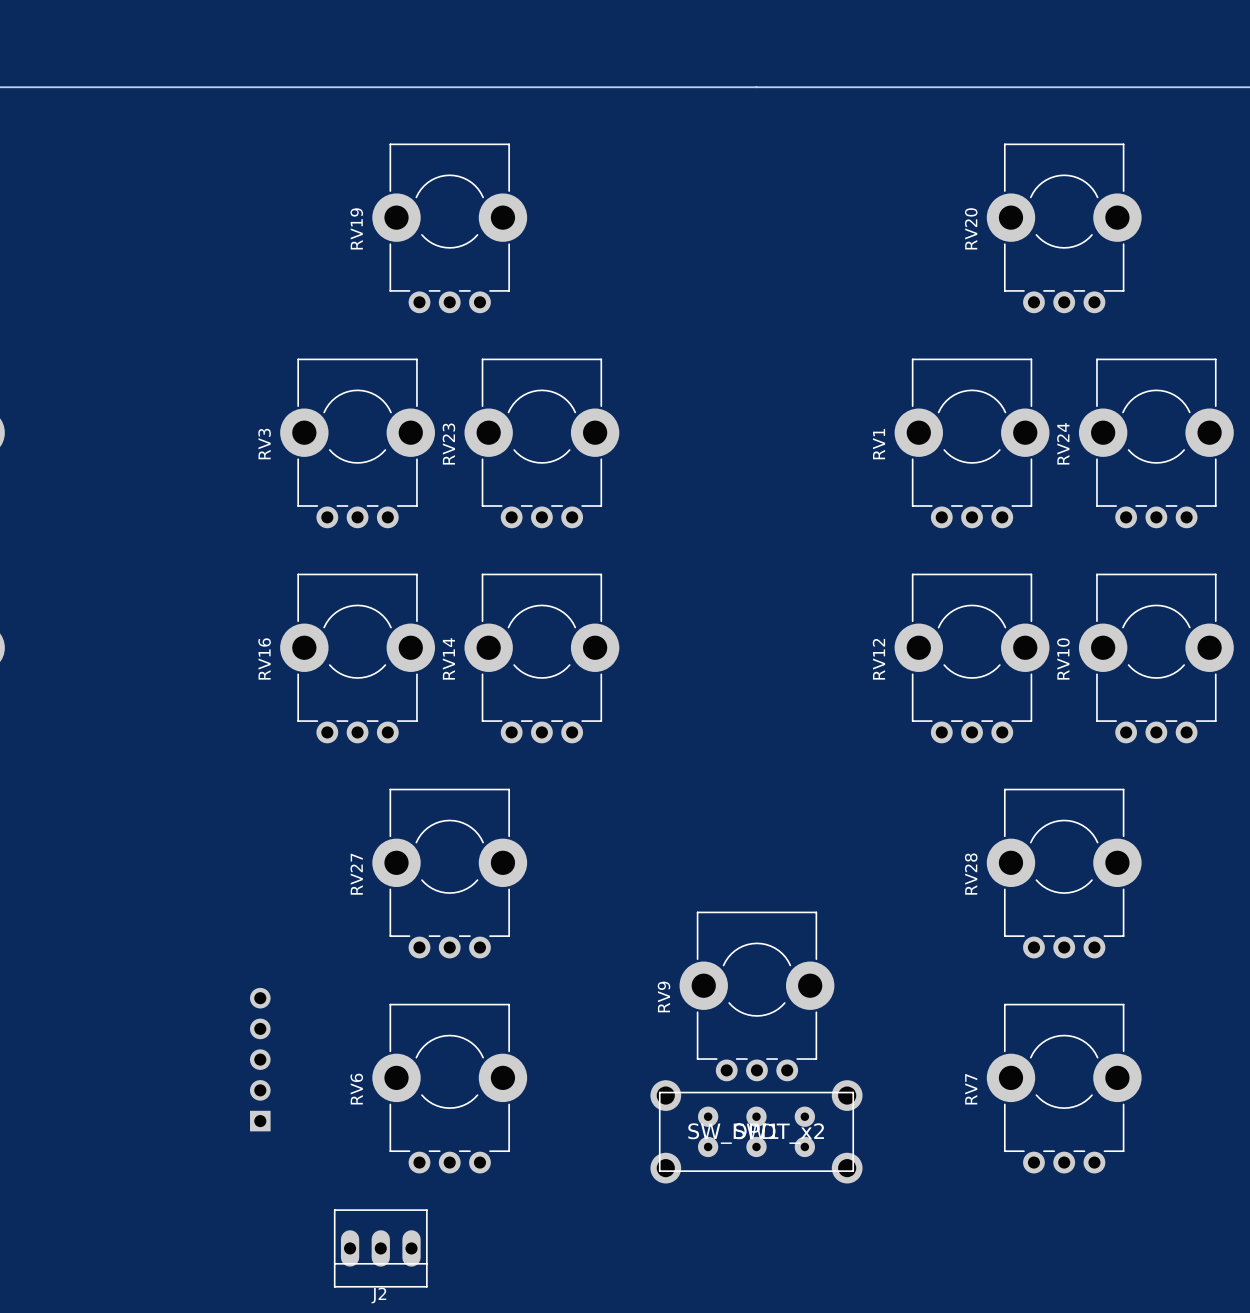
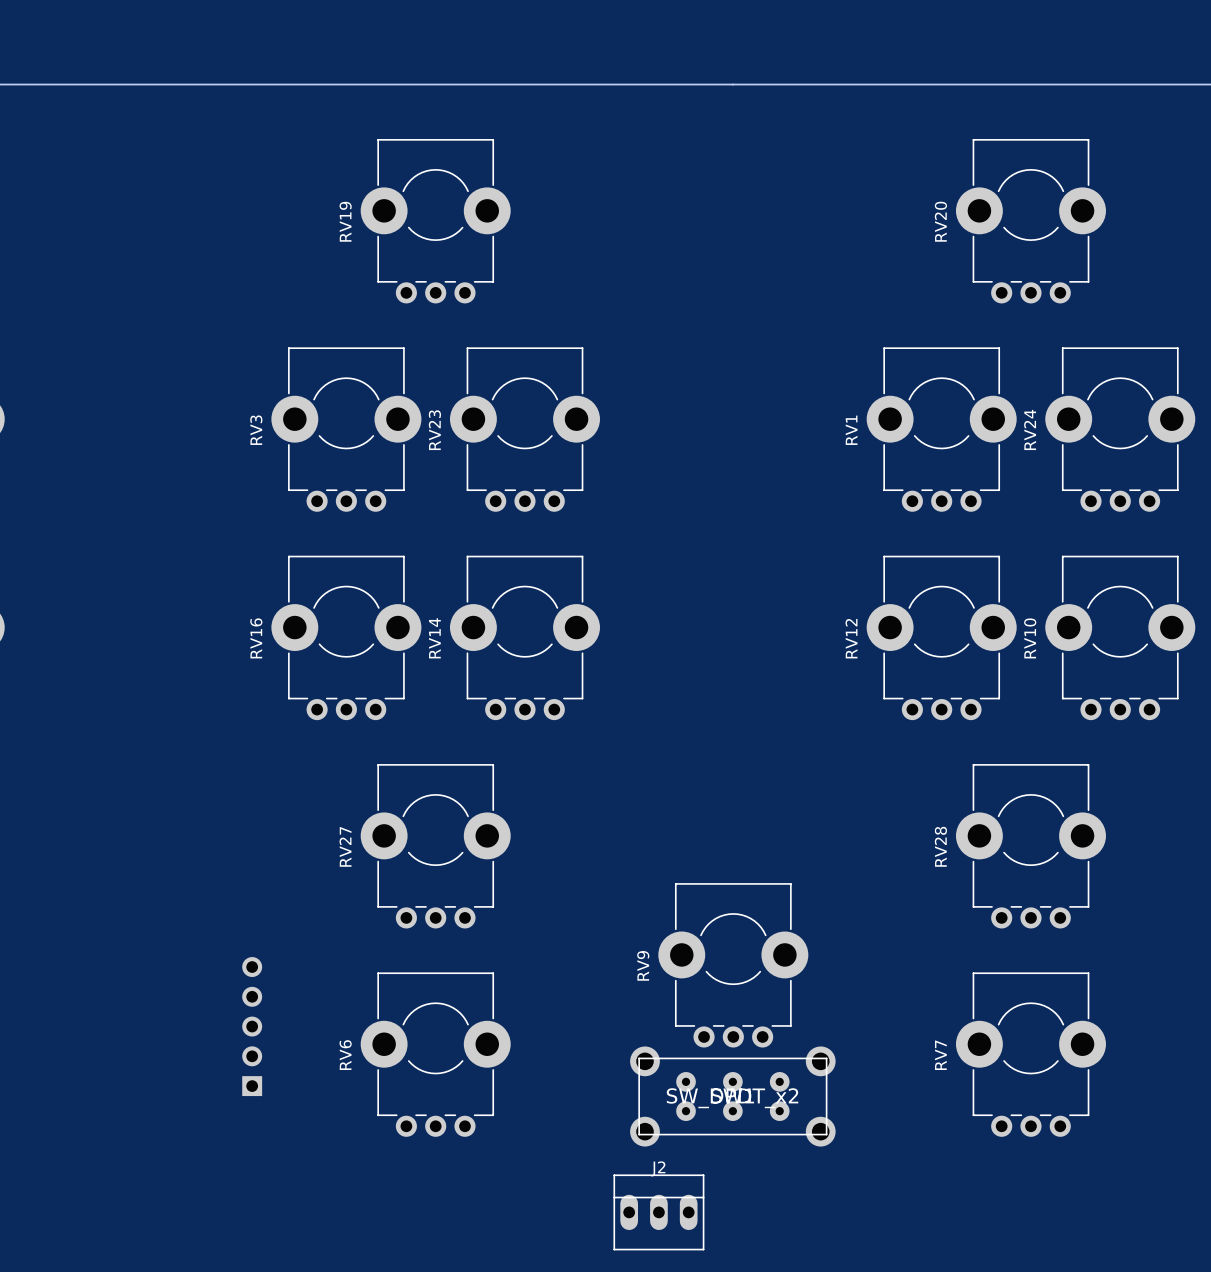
J2 rotation: 0° (380, 1248) -> 180° (658, 1212)
J2 position: (380, 1248) -> (658, 1212)

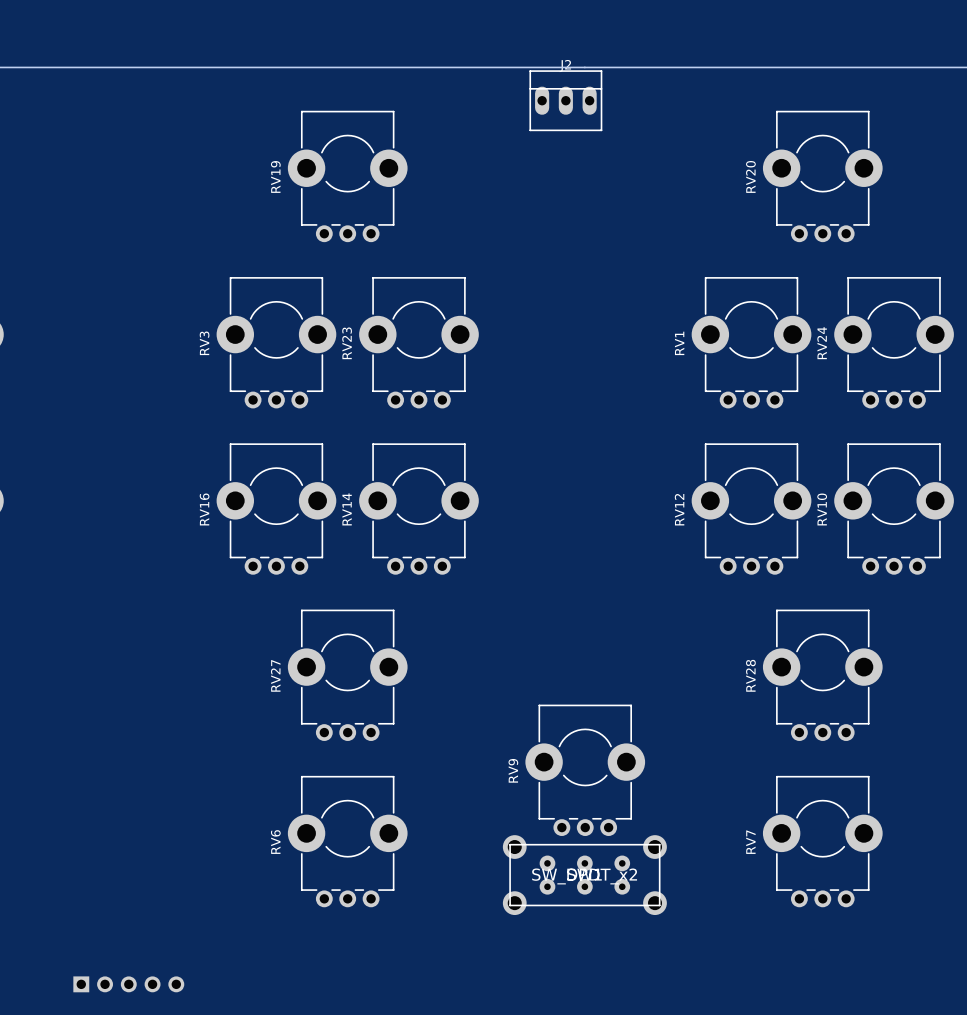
part rotation: 0° (252, 1026) -> 90° clockwise (128, 984)
part position: (252, 1026) -> (128, 984)
J2 position: (658, 1212) -> (565, 100)

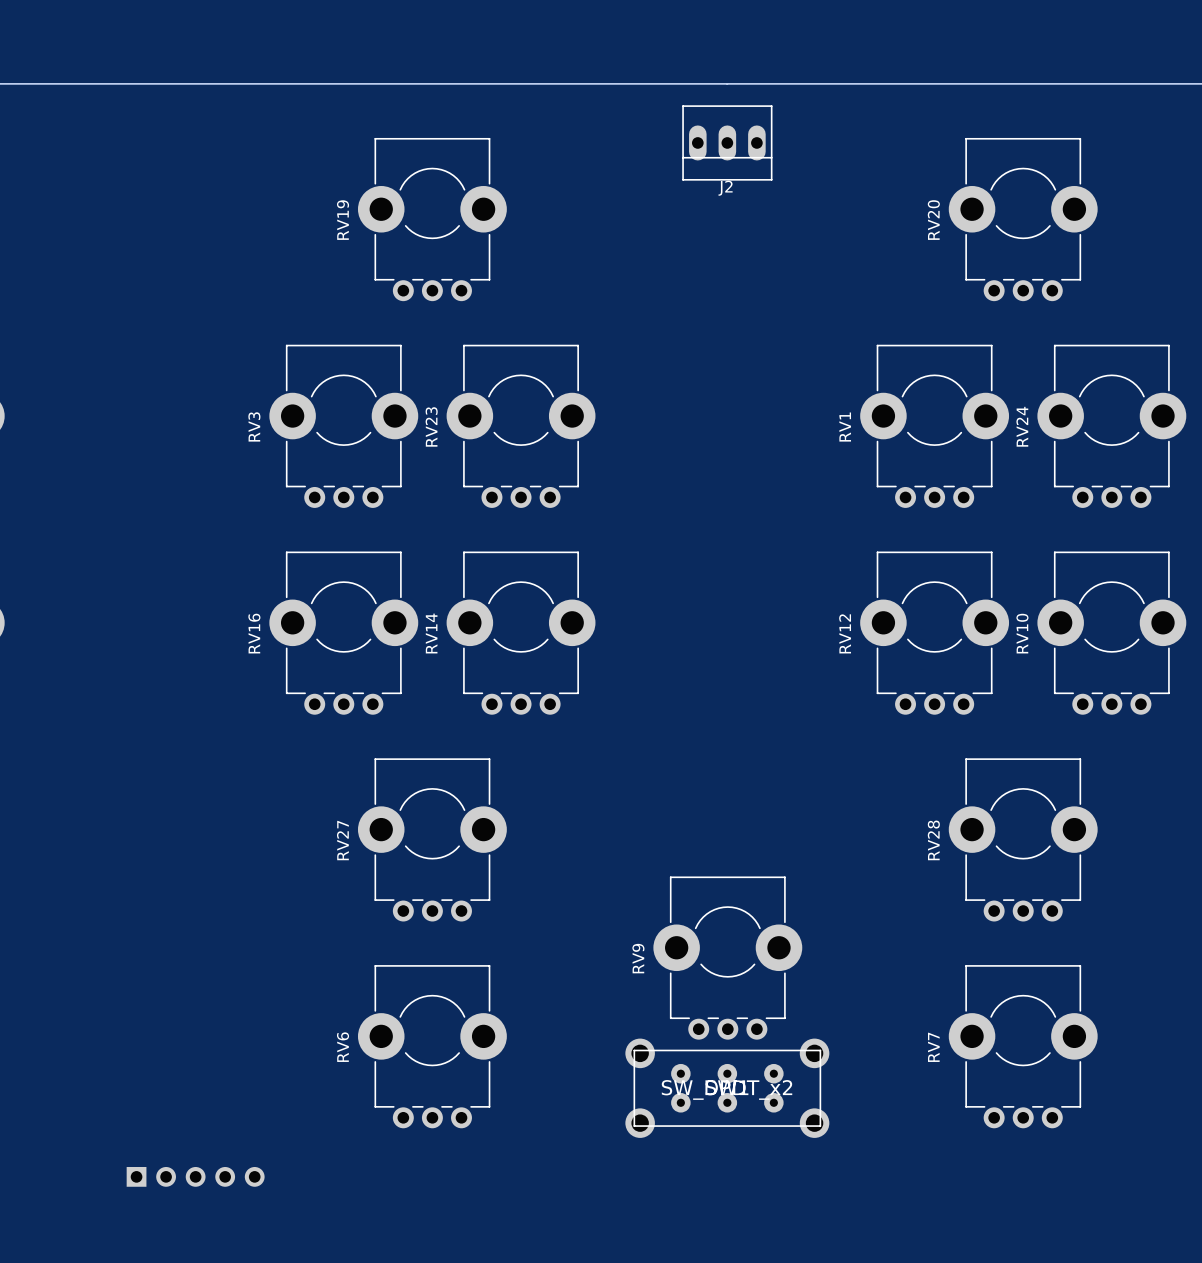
J2 rotation: 0° (565, 100) -> 180° (727, 142)
part position: (128, 984) -> (195, 1176)

